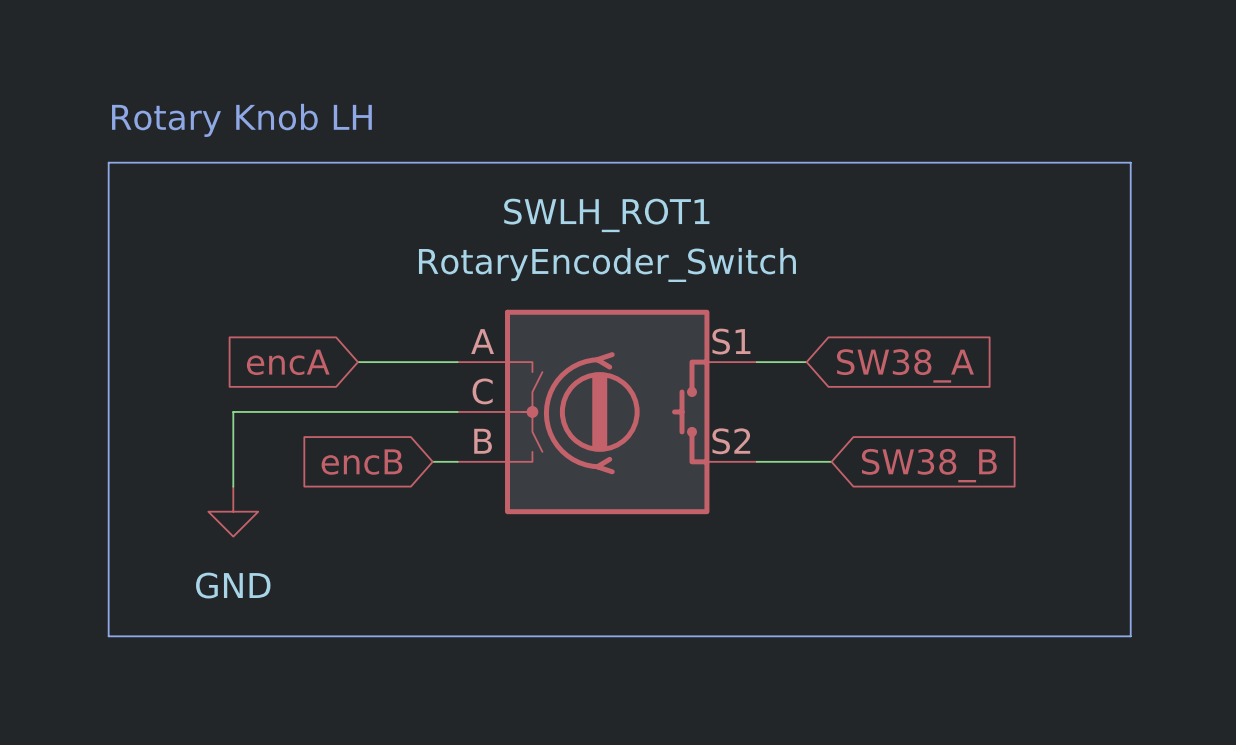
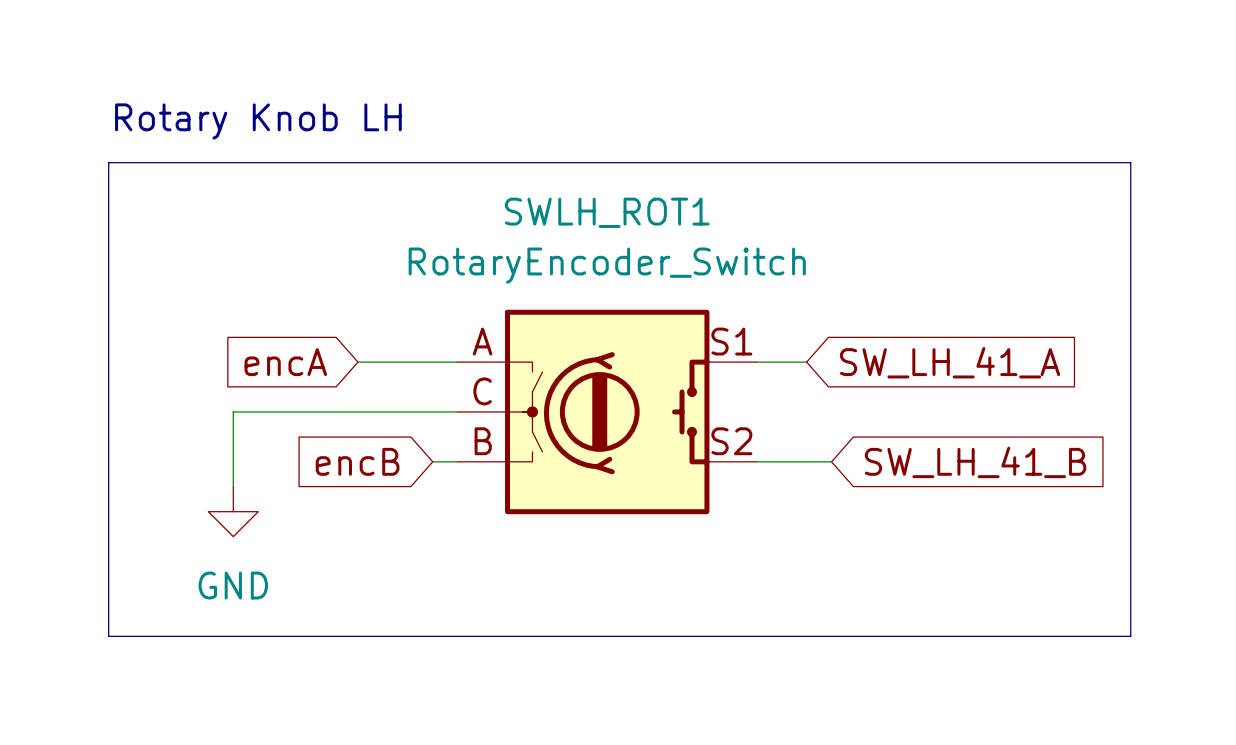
global label: SW38_A (905, 365) -> SW_LH_41_A (950, 362)
global label: SW38_B (929, 465) -> SW_LH_41_B (975, 462)

